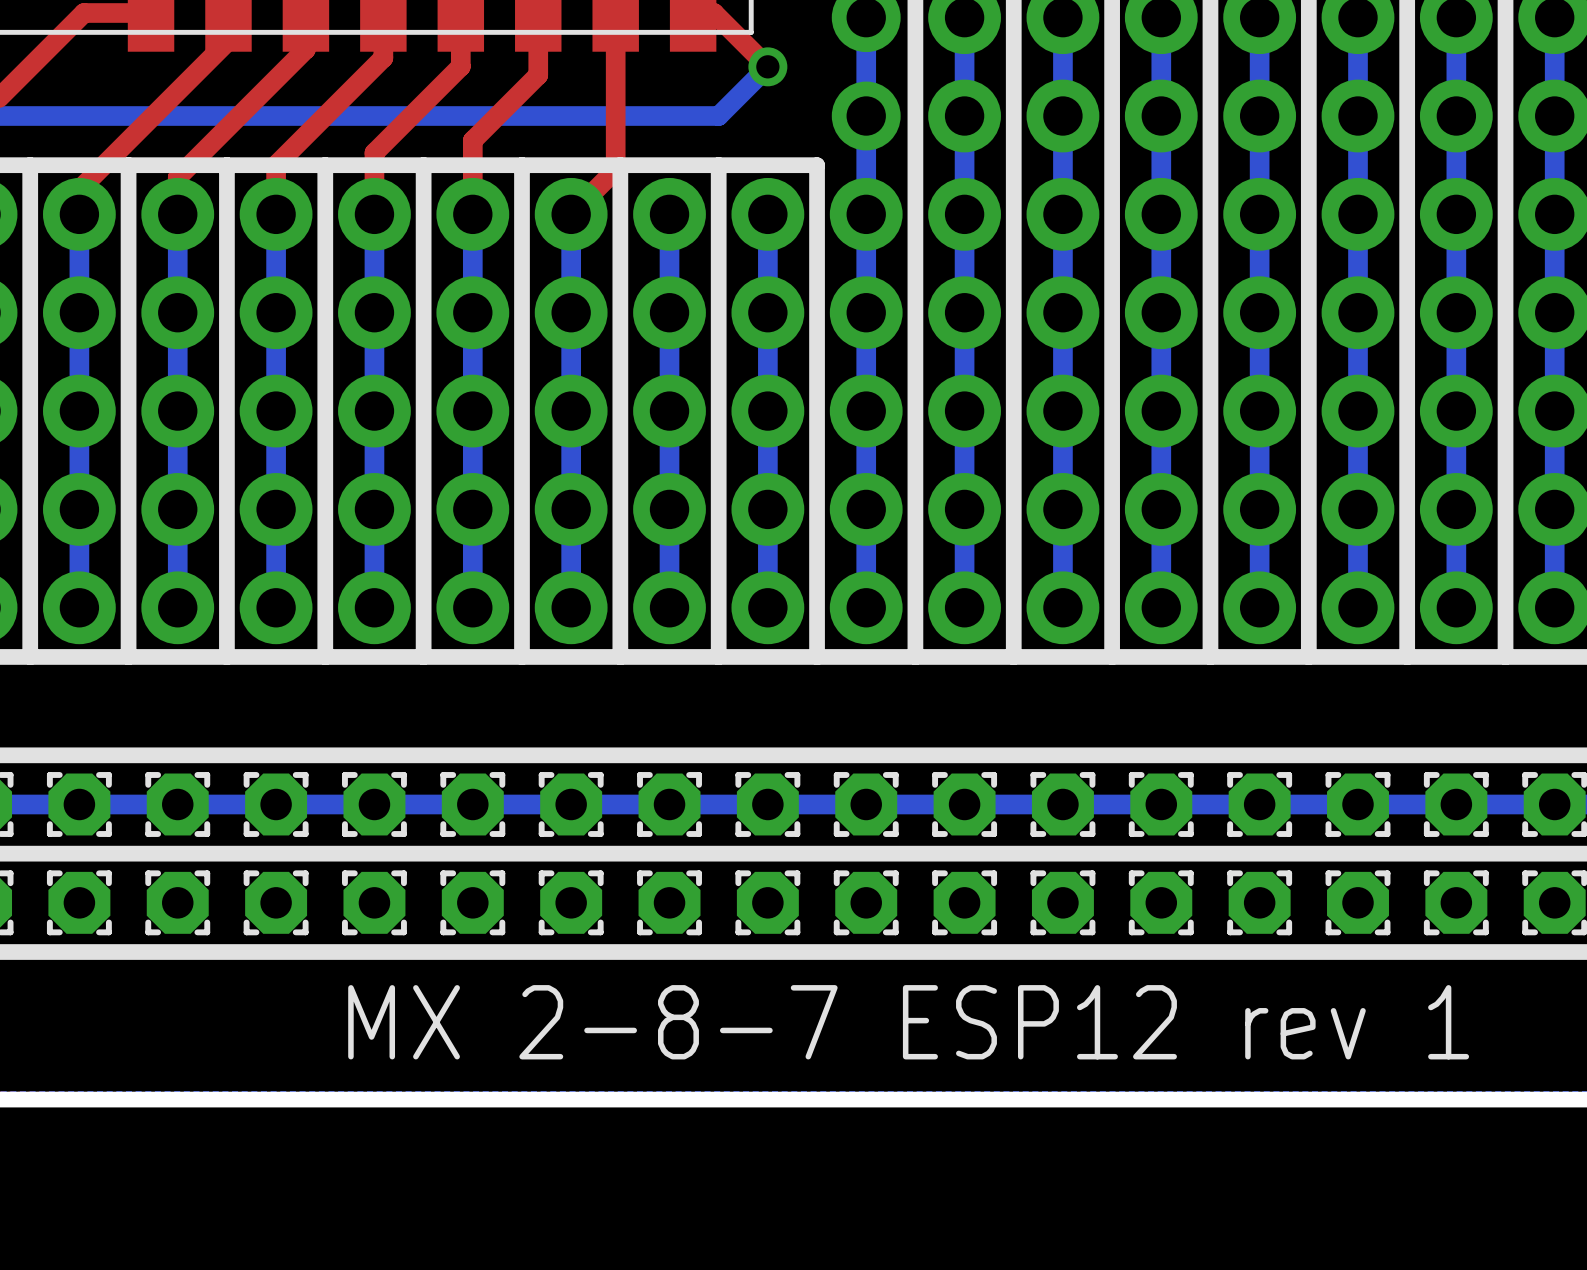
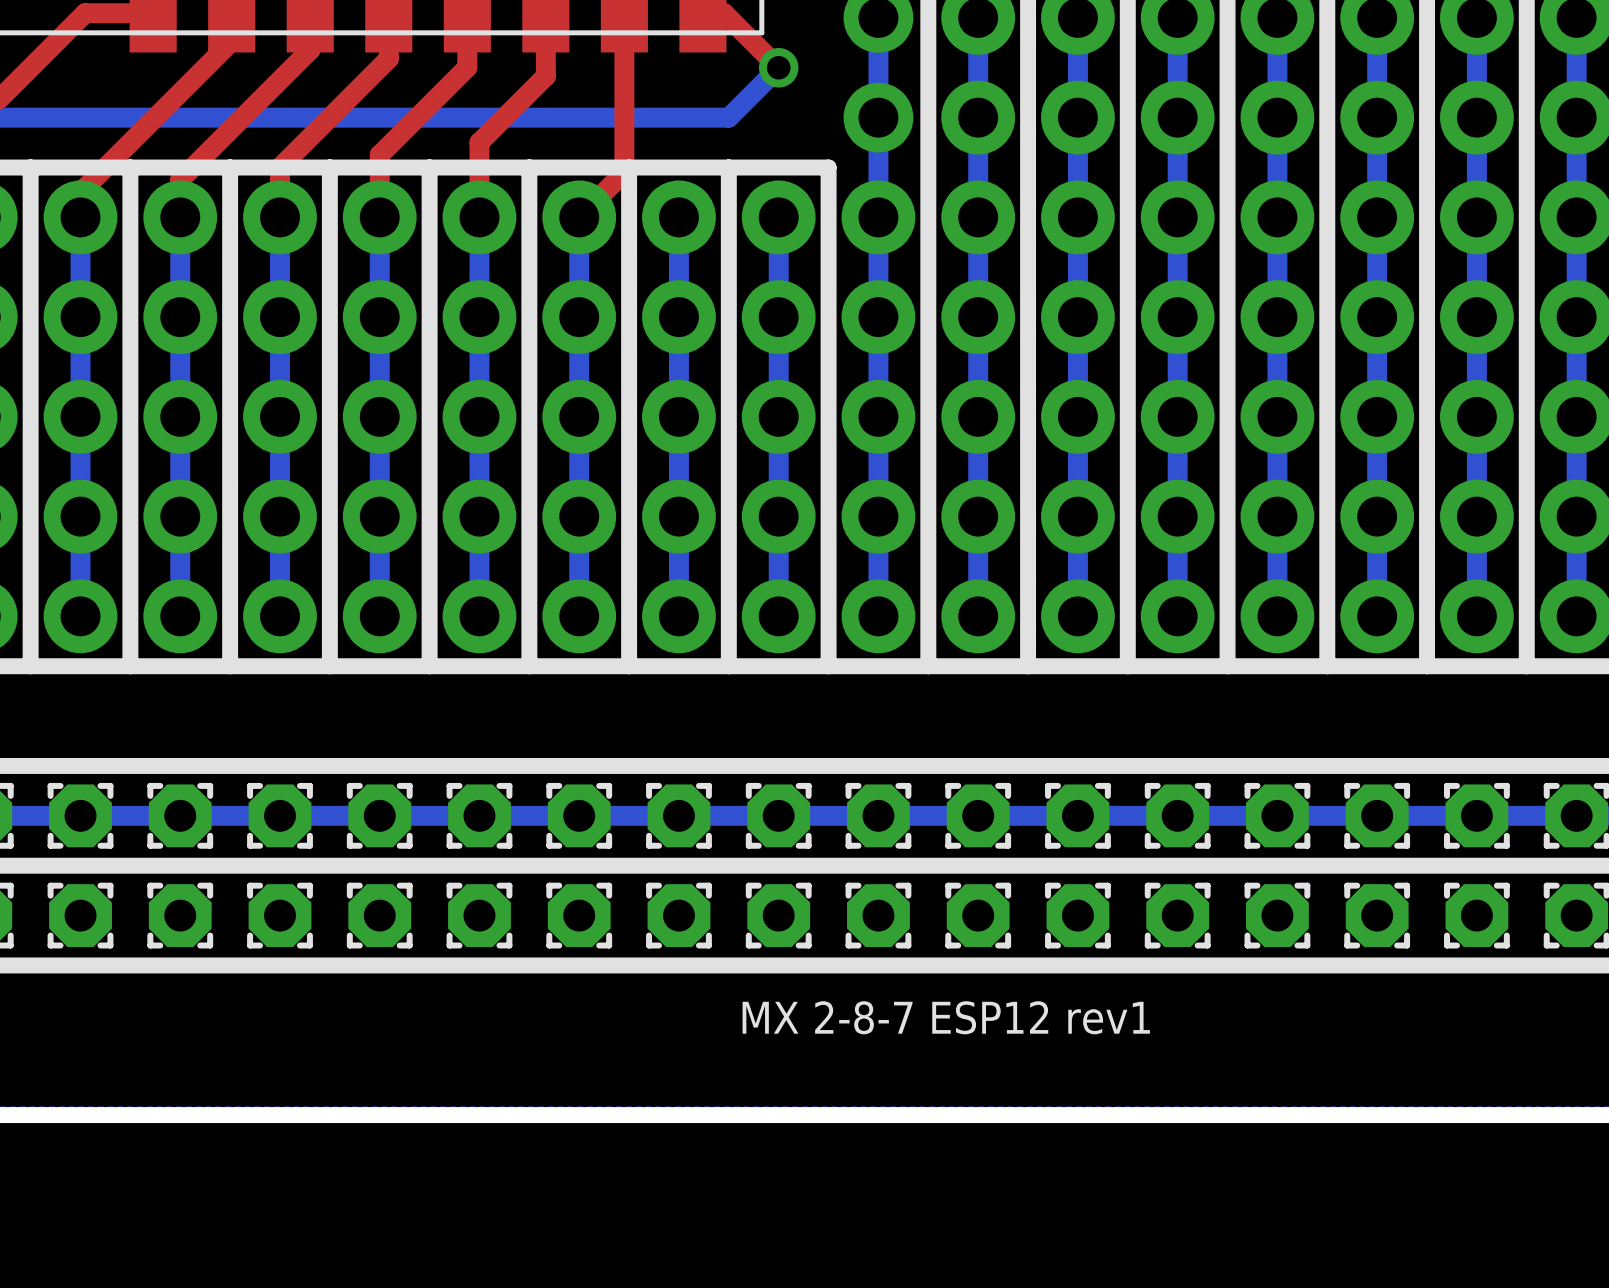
text: MX 2-8-7 ESP12 rev 1 (908, 1022) -> MX 2-8-7 ESP12 rev1 (946, 1017)

